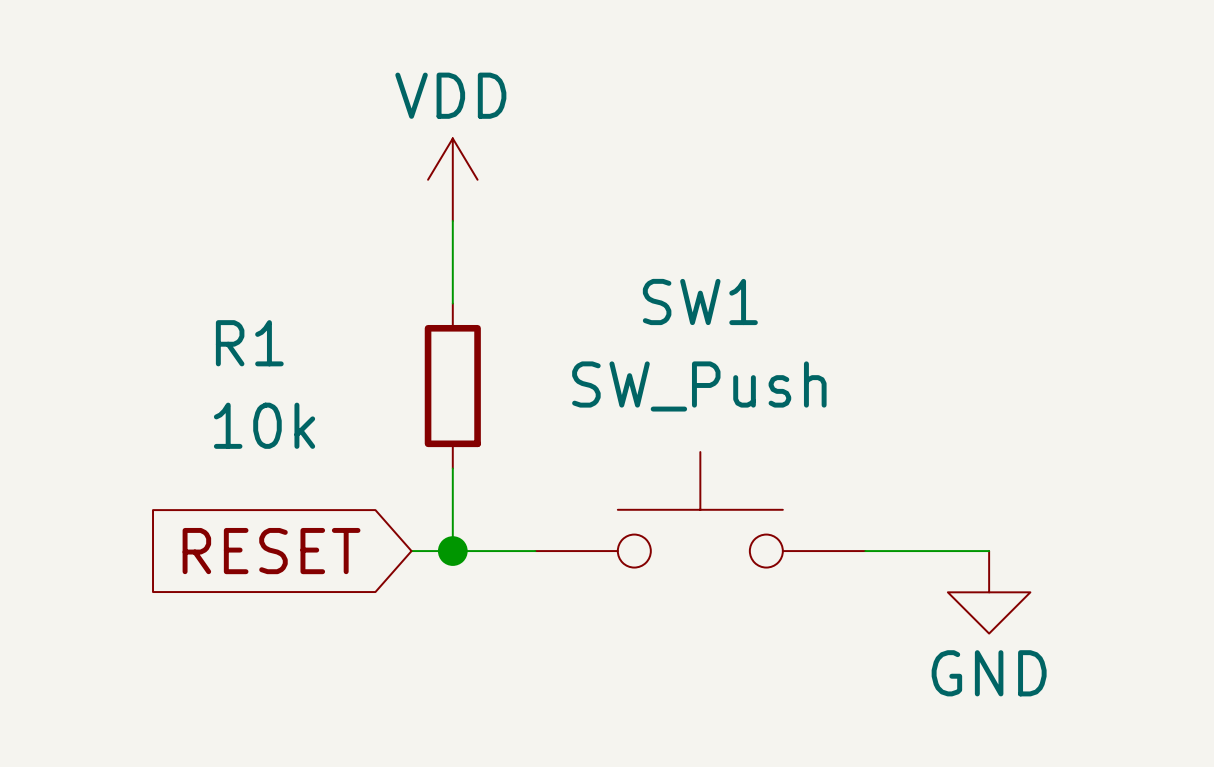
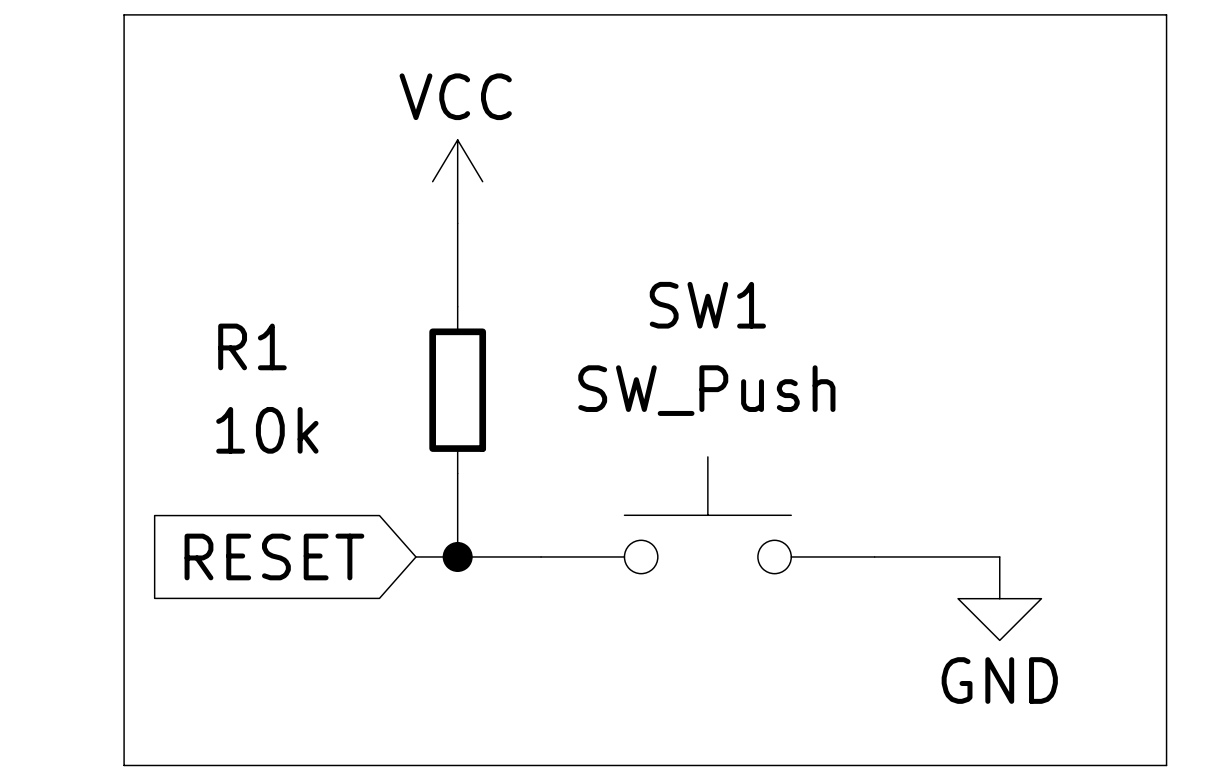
line: none -> (124, 14) (1166, 14) (1166, 765) (124, 765) (124, 14)
power symbol: VDD (452, 179) -> VCC (457, 181)

